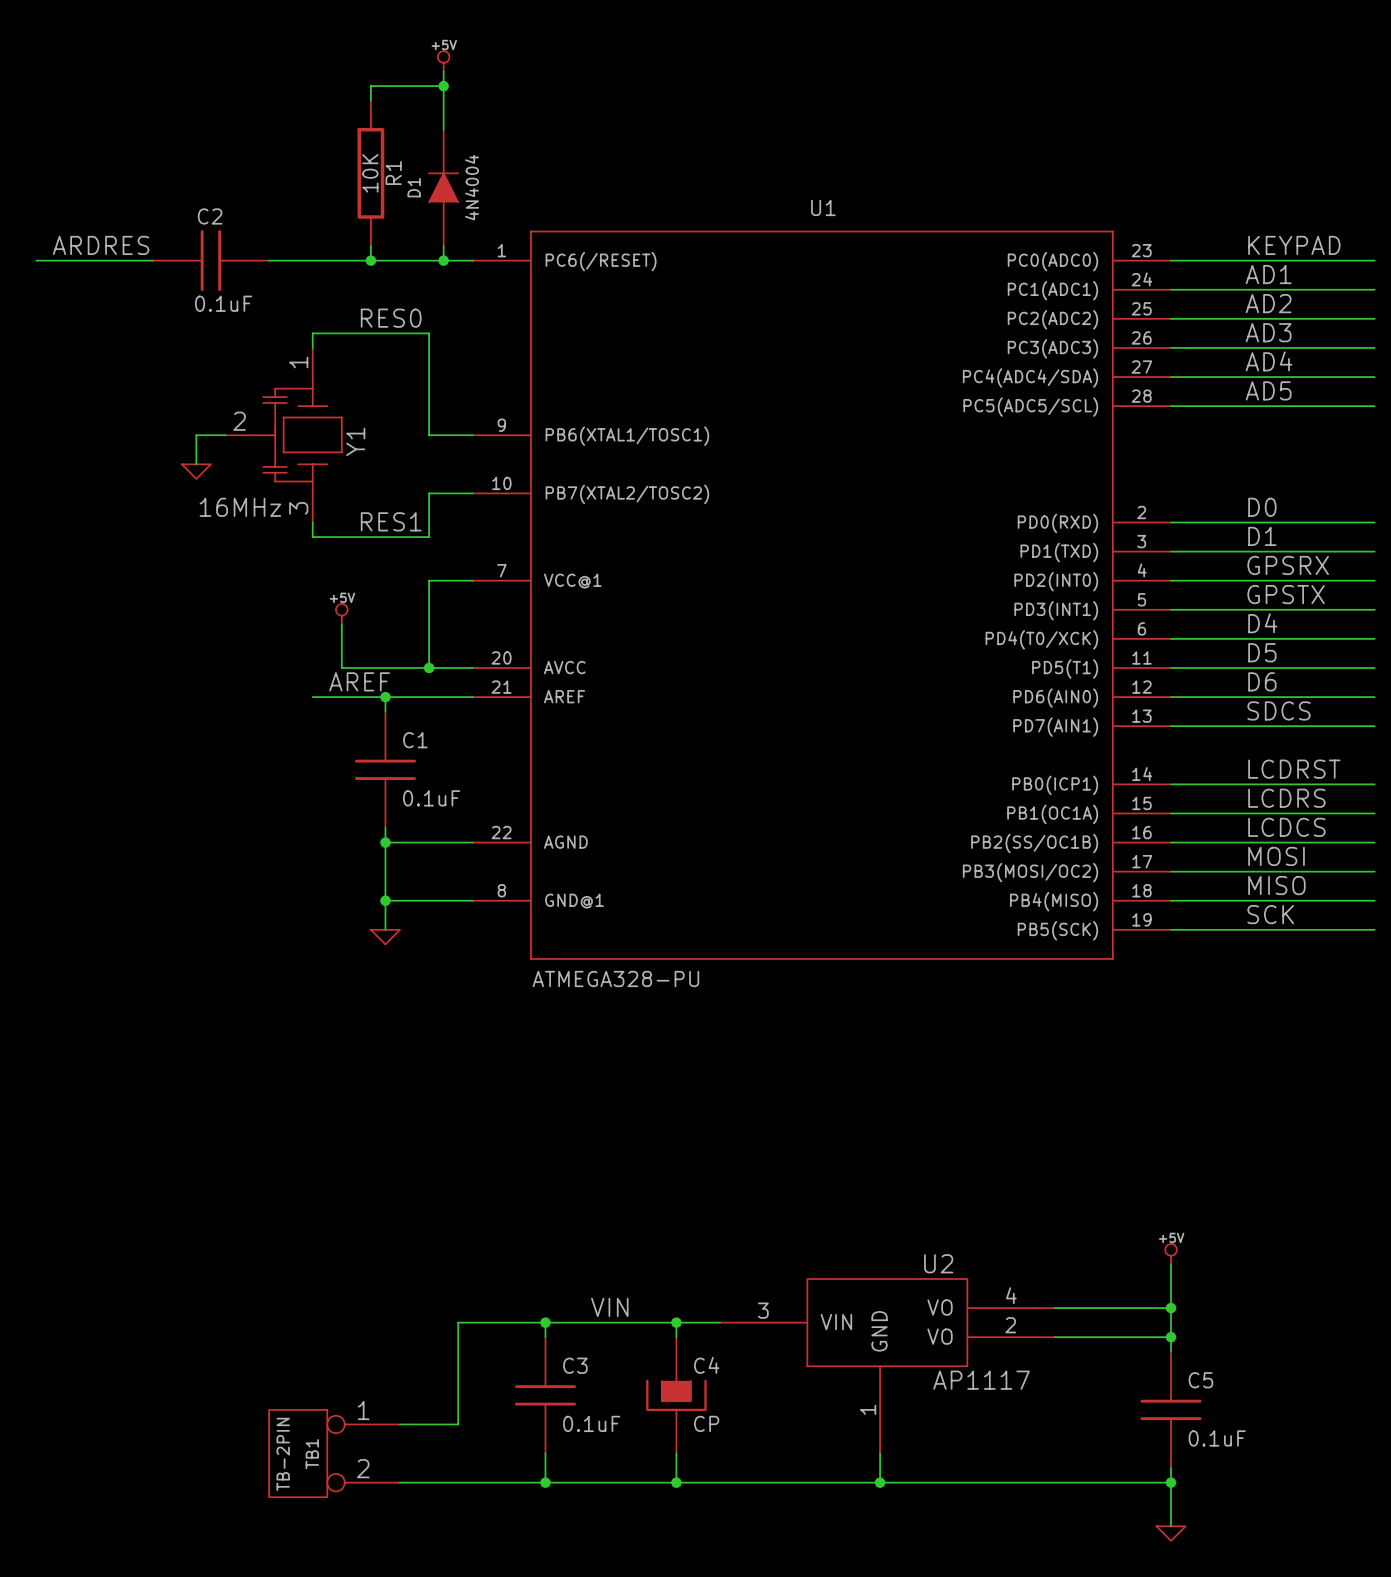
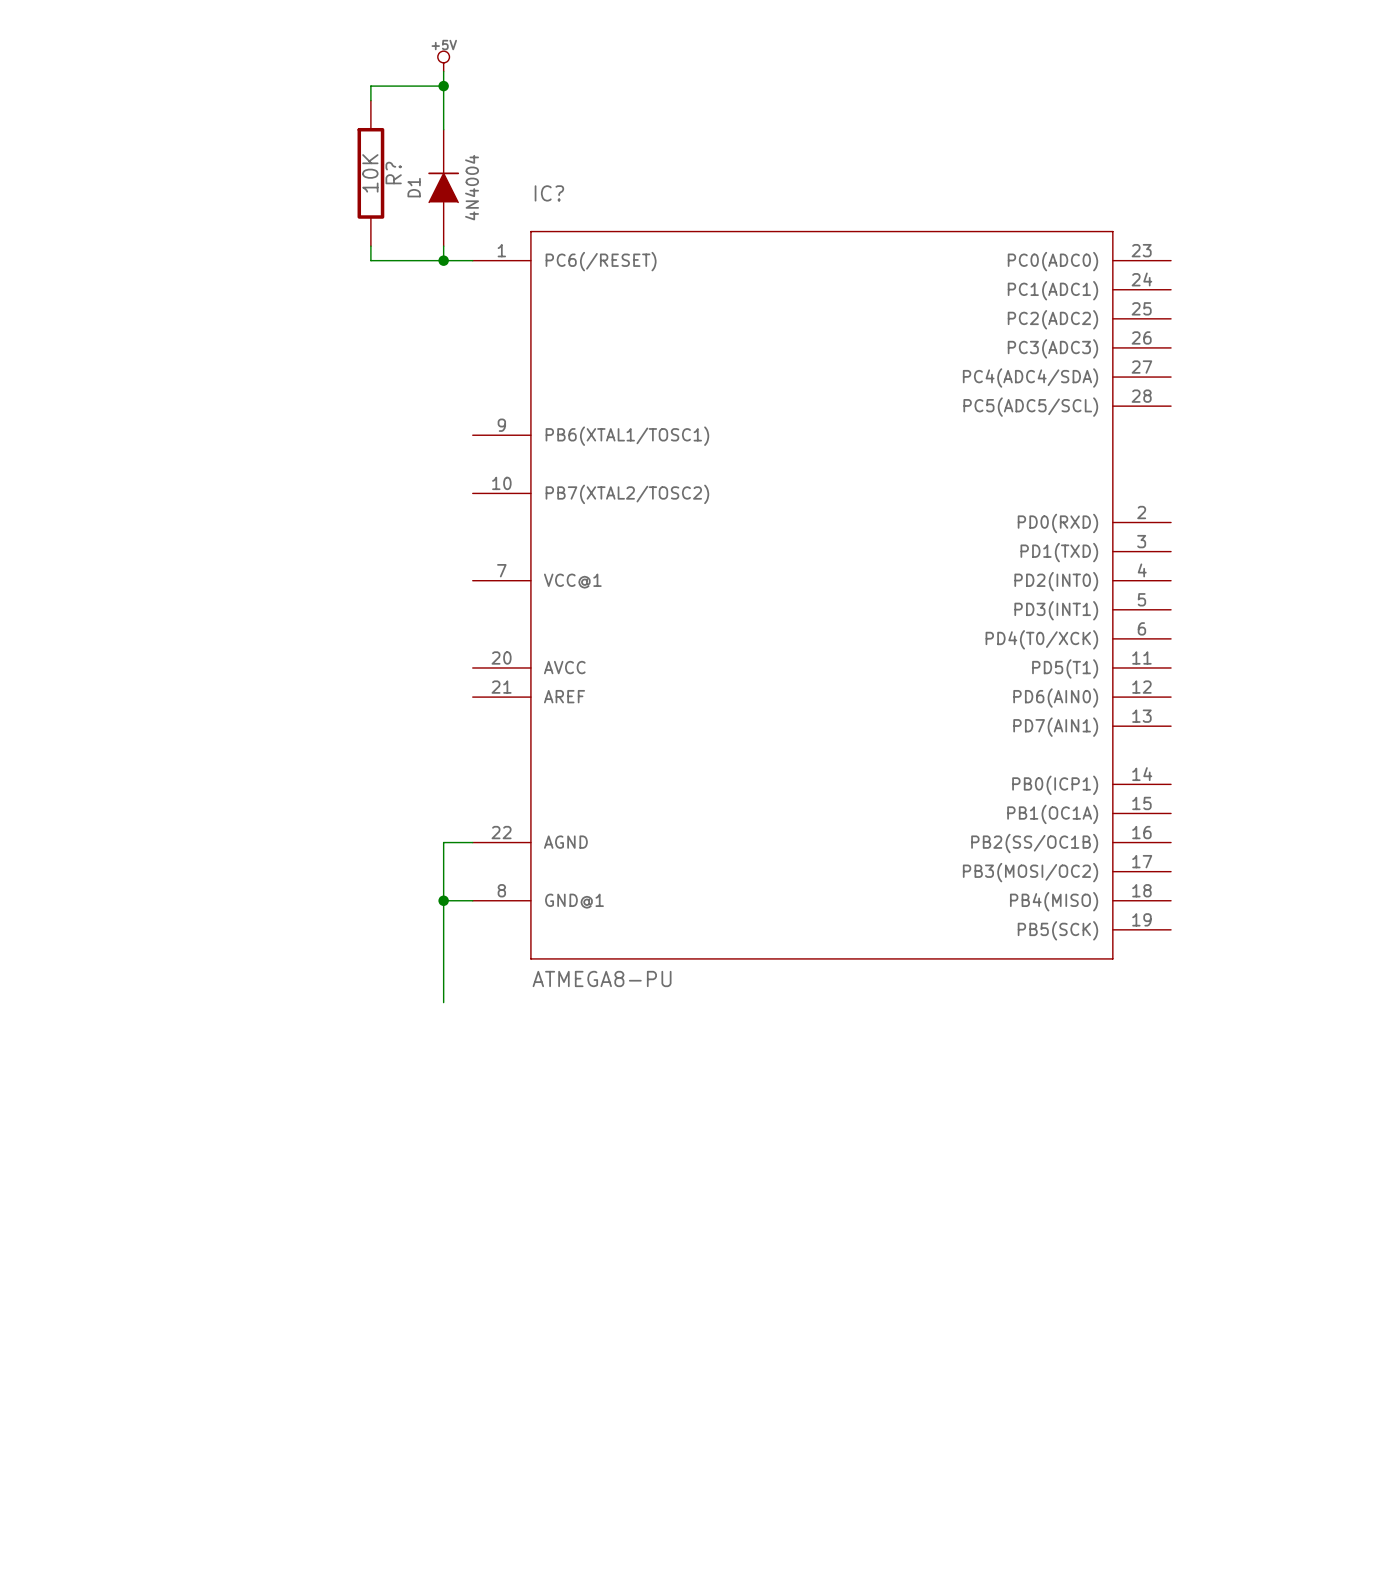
R1 name: R1 (393, 173) -> R? (393, 173)
U1 name: U1 (823, 207) -> IC? (549, 193)
label: ARDRES (101, 245) -> none
label: KEYPAD (1294, 245) -> none
wire: (36, 260) (152, 260) -> none
C2: 0.1uF (210, 260) -> none
wire: (269, 260) (370, 260) -> none
junction: (370, 260) -> none
wire: (1171, 260) (1374, 260) -> none
label: AD1 (1268, 274) -> none
wire: (1171, 289) (1374, 289) -> none
label: AD2 (1268, 303) -> none
label: RES0 (391, 318) -> none
wire: (1171, 318) (1374, 318) -> none
label: AD3 (1268, 332) -> none
wire: (312, 347) (312, 333) (429, 333) (429, 435) (472, 435) -> none
wire: (1171, 347) (1374, 347) -> none
label: AD4 (1269, 361) -> none
wire: (1171, 377) (1374, 377) -> none
label: AD5 (1268, 390) -> none
wire: (1171, 406) (1374, 406) -> none
wire: (225, 435) (196, 435) (196, 464) -> none
Y1: 16MHz (283, 435) -> none
power symbol: (196, 471) -> none
wire: (472, 493) (429, 493) (429, 537) (312, 537) (312, 522) -> none
label: D0 (1262, 507) -> none
label: RES1 (391, 521) -> none
wire: (1171, 522) (1374, 522) -> none
label: D1 (1262, 536) -> none
wire: (1171, 551) (1374, 551) -> none
label: GPSRX (1288, 565) -> none
wire: (472, 580) (429, 580) (429, 667) -> none
wire: (1171, 580) (1374, 580) -> none
label: GPSTX (1286, 594) -> none
wire: (1171, 609) (1374, 609) -> none
power symbol: +5V (341, 614) -> none
label: D4 (1262, 623) -> none
wire: (341, 624) (341, 667) (472, 667) -> none
wire: (1171, 638) (1374, 638) -> none
label: D5 (1262, 652) -> none
junction: (429, 667) -> none
wire: (1171, 667) (1374, 667) -> none
label: AREF (359, 681) -> none
label: D6 (1262, 681) -> none
wire: (312, 697) (472, 697) -> none
wire: (385, 697) (385, 711) -> none
junction: (385, 697) -> none
wire: (1171, 697) (1374, 697) -> none
label: SDCS (1279, 710) -> none
wire: (1171, 726) (1374, 726) -> none
C1: 0.1uF (385, 769) -> none
label: LCDRST (1294, 769) -> none
wire: (1171, 784) (1374, 784) -> none
label: LCDRS (1286, 798) -> none
wire: (1171, 813) (1374, 813) -> none
label: LCDCS (1286, 827) -> none
wire: (385, 828) (385, 929) -> none
wire: (385, 842) (443, 842) -> (443, 1002) (443, 842)
junction: (385, 842) -> none
wire: (1171, 842) (1374, 842) -> none
label: MOSI (1276, 856) -> none
wire: (1171, 871) (1374, 871) -> none
label: MISO (1276, 885) -> none
wire: (385, 900) (443, 900) -> none
junction: (385, 900) -> none
junction: none -> (443, 900)
wire: (1171, 900) (1374, 900) -> none
label: SCK (1270, 914) -> none
wire: (1171, 929) (1374, 929) -> none
power symbol: (385, 937) -> none
U1 value: ATMEGA328-PU (615, 978) -> ATMEGA8-PU (602, 978)
power symbol: +5V (1171, 1254) -> none
wire: (1171, 1264) (1171, 1351) -> none
label: VIN (609, 1307) -> none
wire: (1054, 1308) (1171, 1308) -> none
junction: (1171, 1308) -> none
wire: (545, 1322) (545, 1337) -> none
junction: (545, 1322) -> none
wire: (676, 1322) (676, 1337) -> none
junction: (676, 1322) -> none
wire: (720, 1322) (458, 1322) (458, 1424) (400, 1424) -> none
wire: (1054, 1337) (1171, 1337) -> none
junction: (1171, 1337) -> none
U2: AP1117 (887, 1366) -> none
C3: 0.1uF (545, 1395) -> none
C4: CP (676, 1395) -> none
C5: 0.1uF (1171, 1409) -> none
TB1: TB-2PIN (334, 1453) -> none
wire: (545, 1453) (545, 1482) -> none
wire: (676, 1453) (676, 1482) -> none
wire: (880, 1453) (880, 1482) -> none
wire: (1171, 1468) (1171, 1526) -> none
wire: (400, 1482) (1171, 1482) -> none
junction: (545, 1482) -> none
junction: (676, 1482) -> none
junction: (880, 1482) -> none
junction: (1171, 1482) -> none
power symbol: (1171, 1533) -> none

